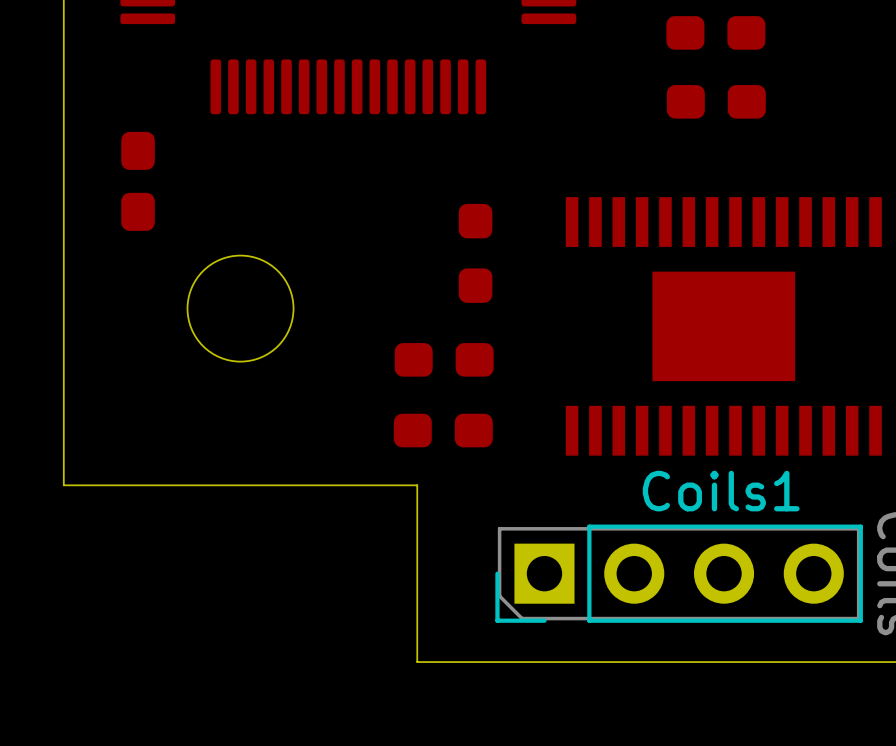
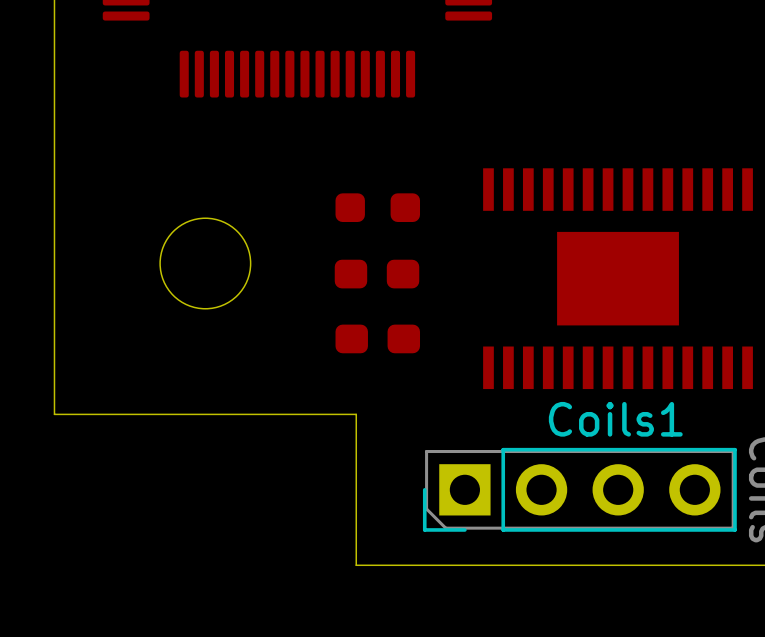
part: (715, 32) -> none
part: (716, 101) -> none
part: (138, 181) -> none
part rotation: 0° (475, 253) -> 90° clockwise (377, 207)
part: none -> (377, 274)
part: (444, 359) -> none
part: none -> (377, 338)
part: (443, 430) -> none

